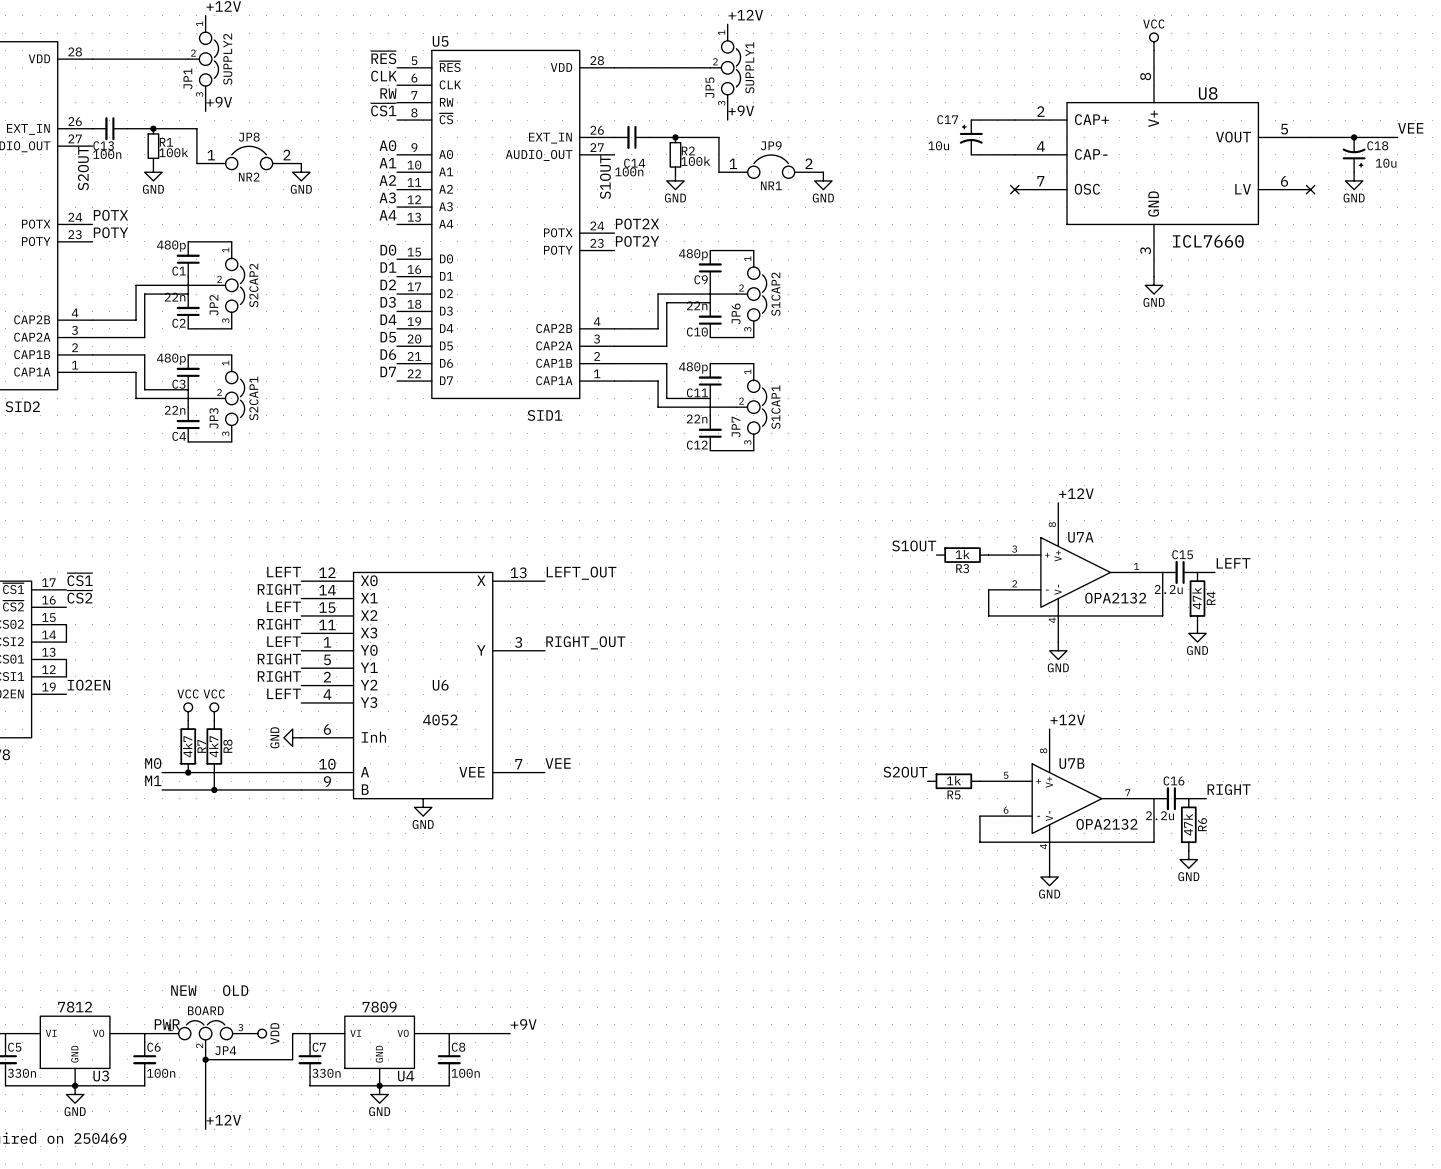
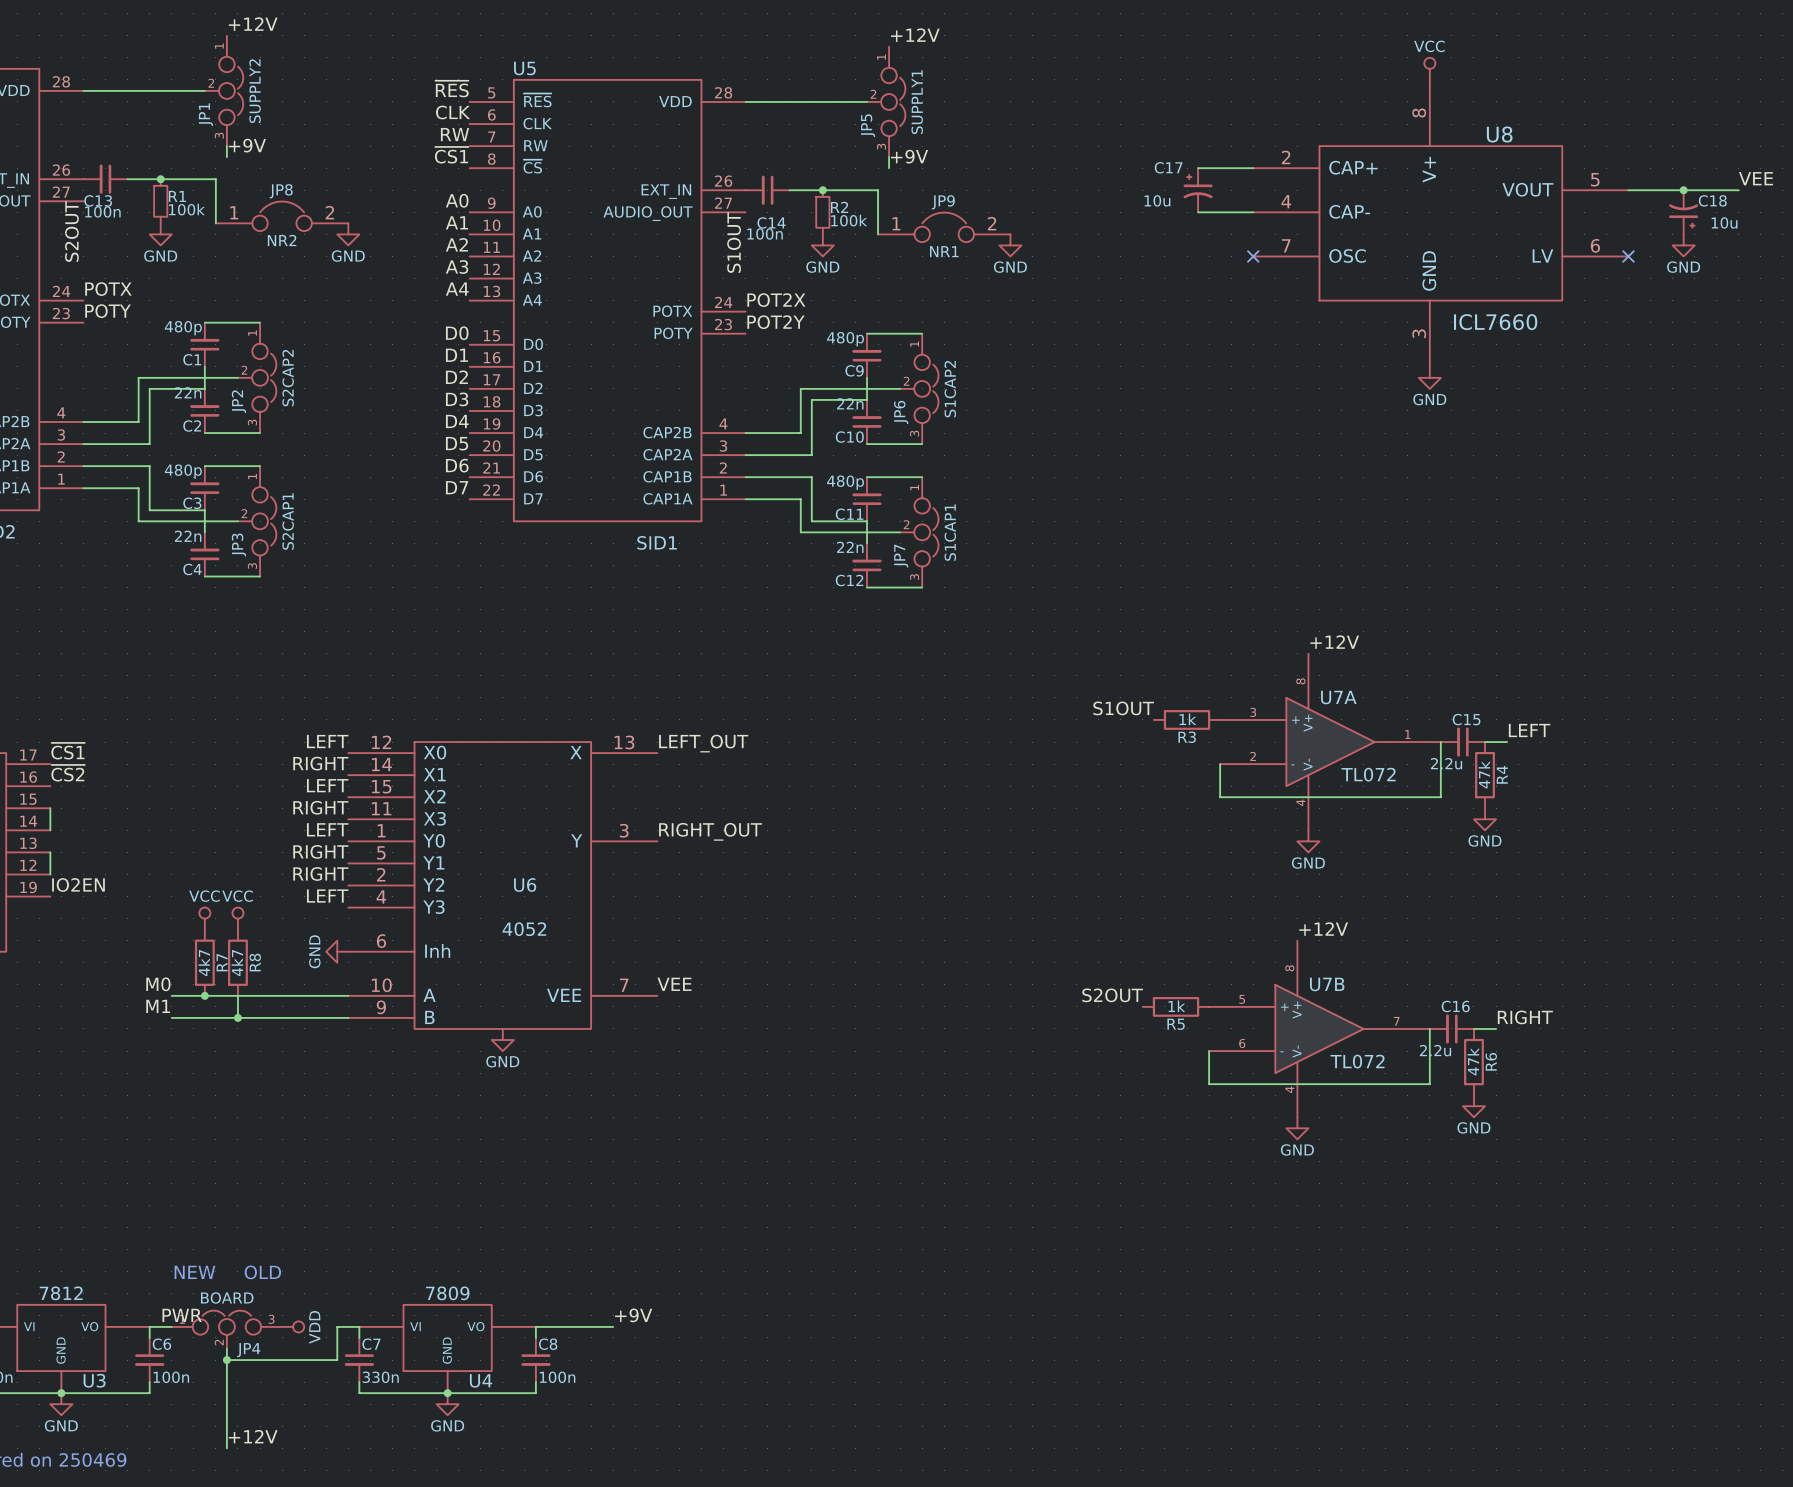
U7A value: OPA2132 (1115, 598) -> TL072 (1368, 774)
U7B value: OPA2132 (1107, 824) -> TL072 (1357, 1061)

